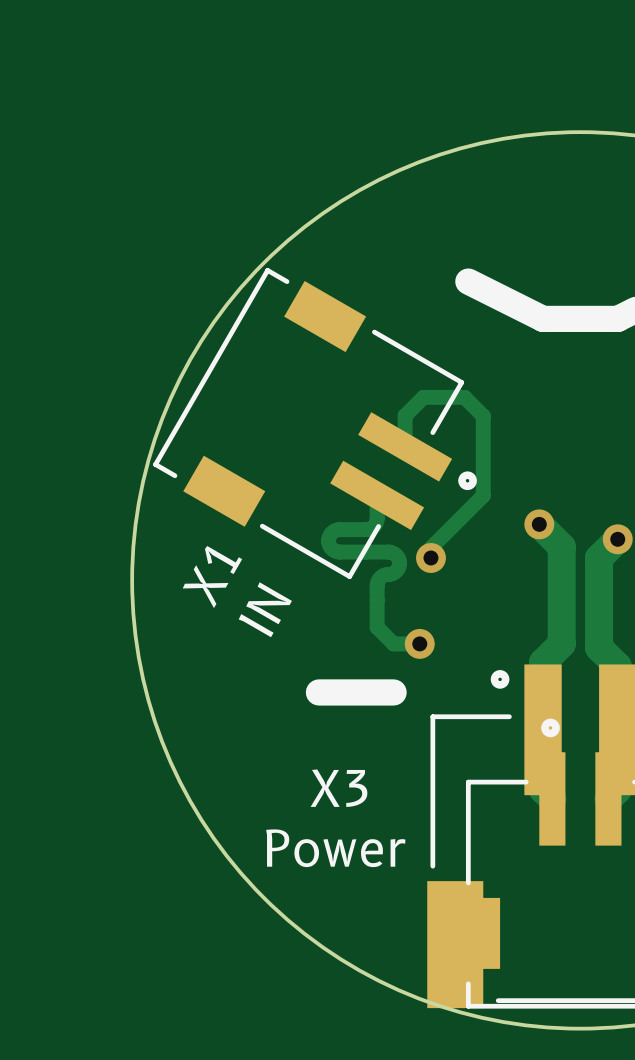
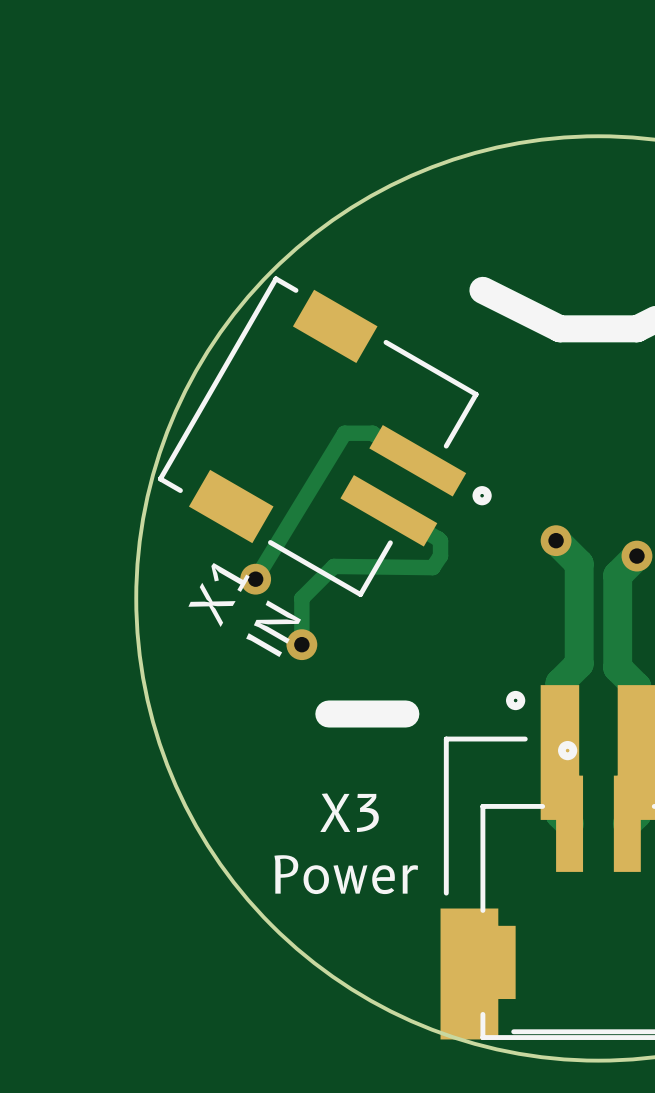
track: (405, 446) (405, 415) (423, 397) (464, 397) (483, 416) (483, 495) (430, 547) (430, 557) -> (417, 460) (372, 433) (344, 433) (255, 579)
track: (377, 495) (377, 519) (373, 526) (367, 529) (335, 530) (329, 536) (328, 543) (332, 549) (338, 551) (388, 552) (396, 555) (399, 563) (397, 570) (392, 573) (382, 575) (377, 582) (377, 627) (393, 643) (419, 643) -> (388, 510) (438, 538) (440, 541) (440, 556) (432, 567) (333, 566) (301, 598) (301, 644)
via: (430, 557) -> none
via: none -> (255, 579)
via: none -> (301, 644)
via: (419, 643) -> none

